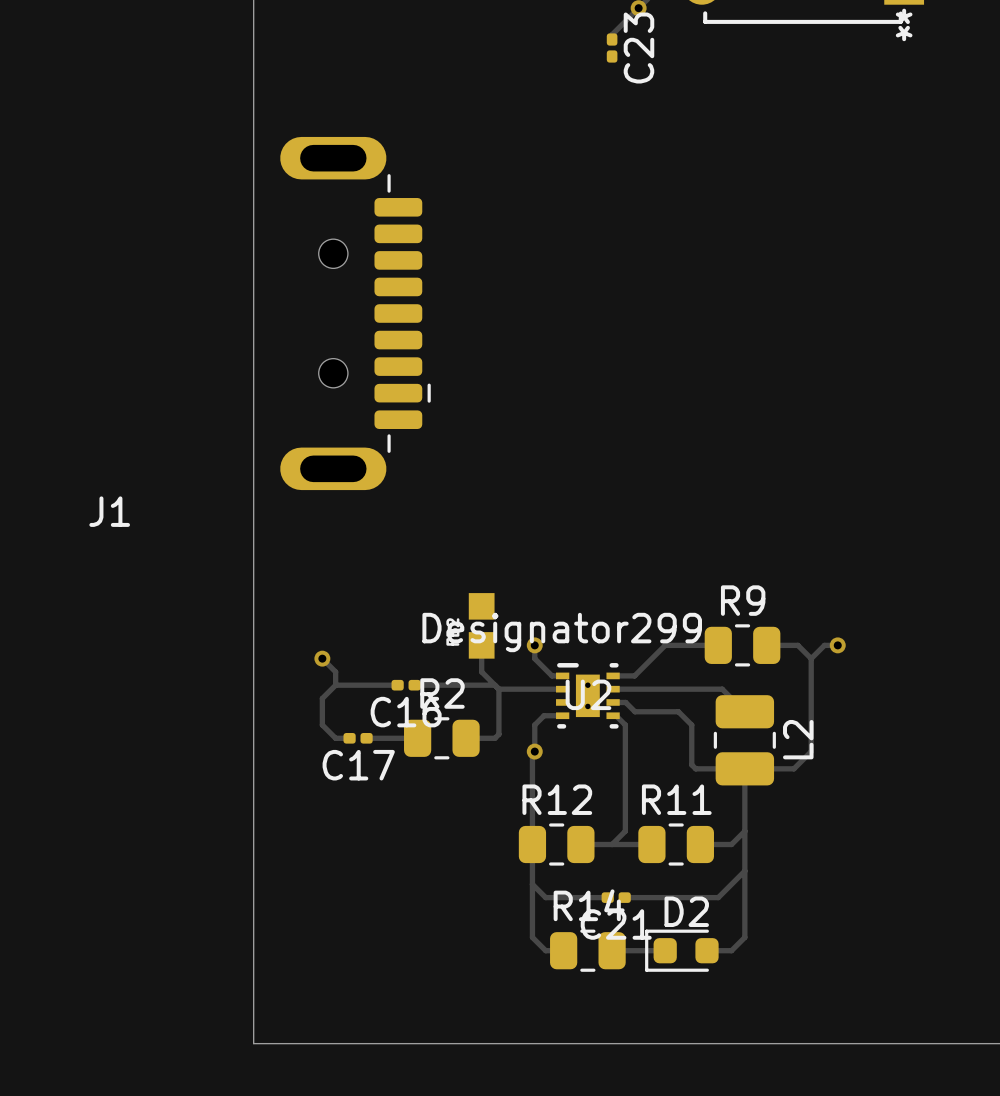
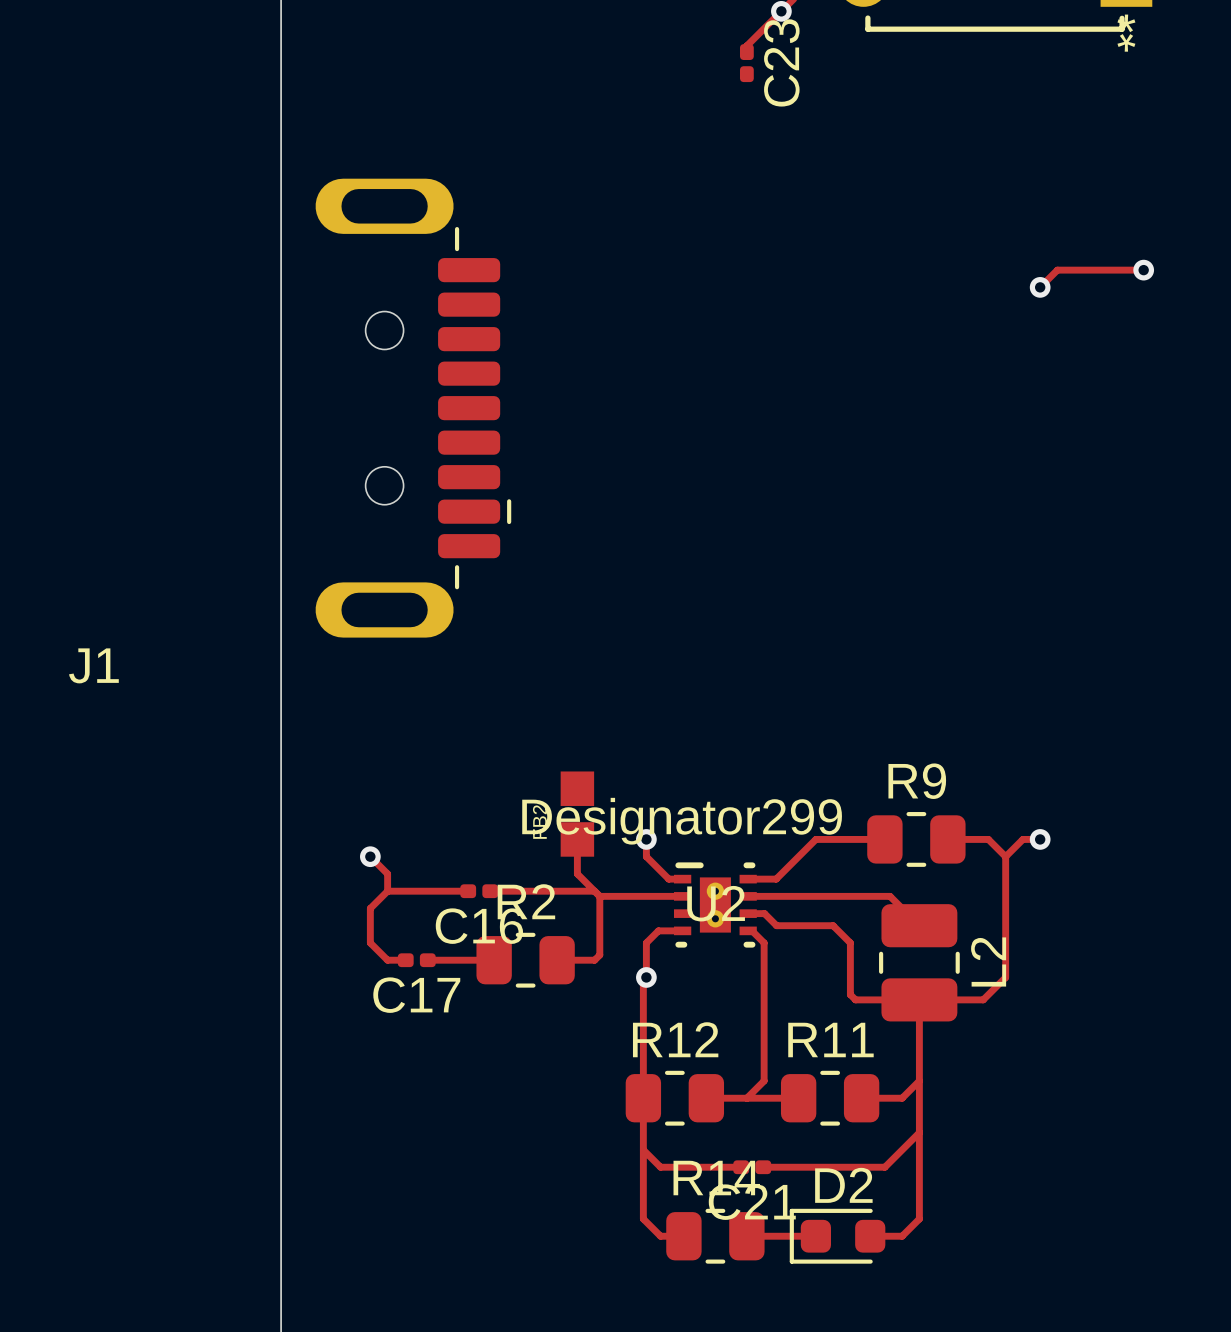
track: none -> (1143, 270) (1057, 270) (1040, 287)
via: none -> (1143, 270)
via: none -> (1040, 287)

